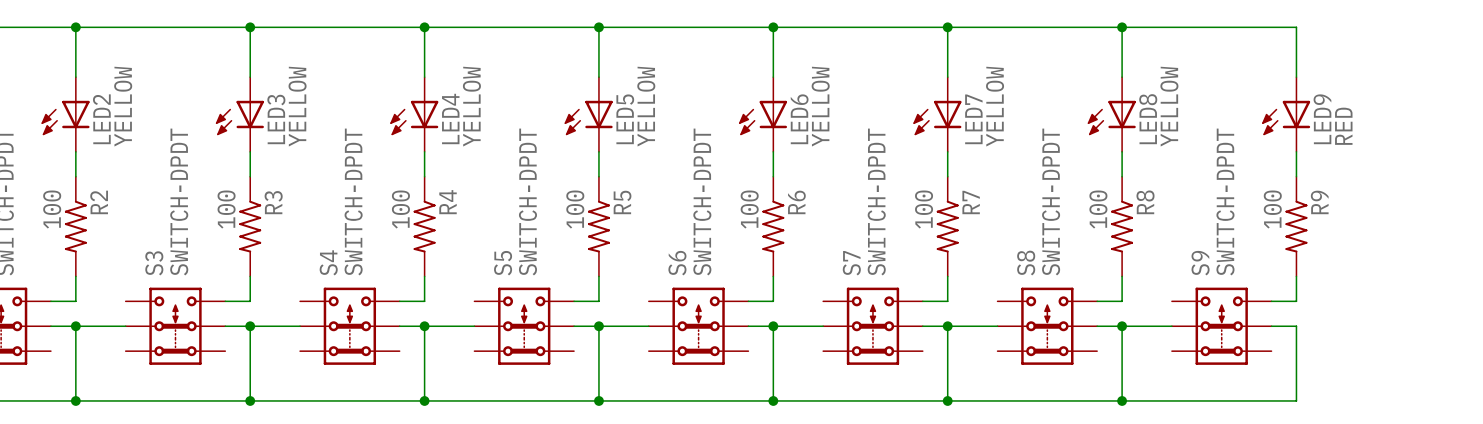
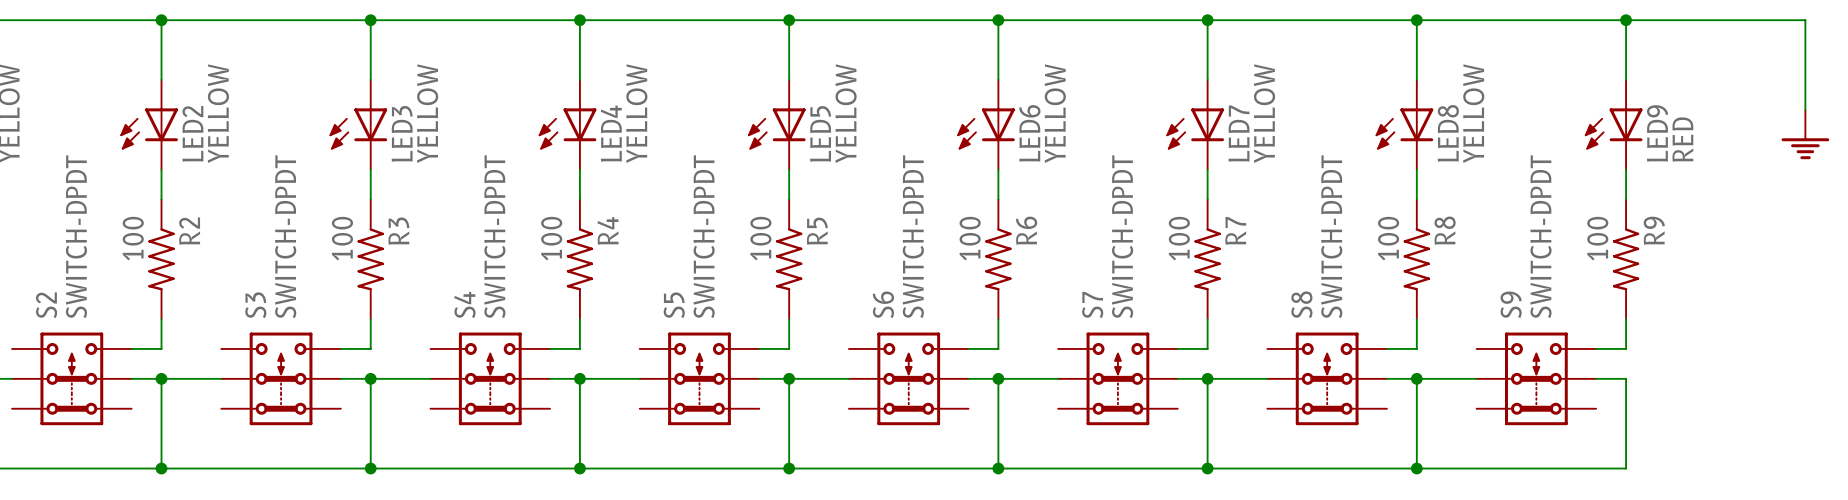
wire: none -> (1626, 20) (1805, 20) (1805, 109)
junction: none -> (1626, 20)
power symbol: none -> (1805, 134)

